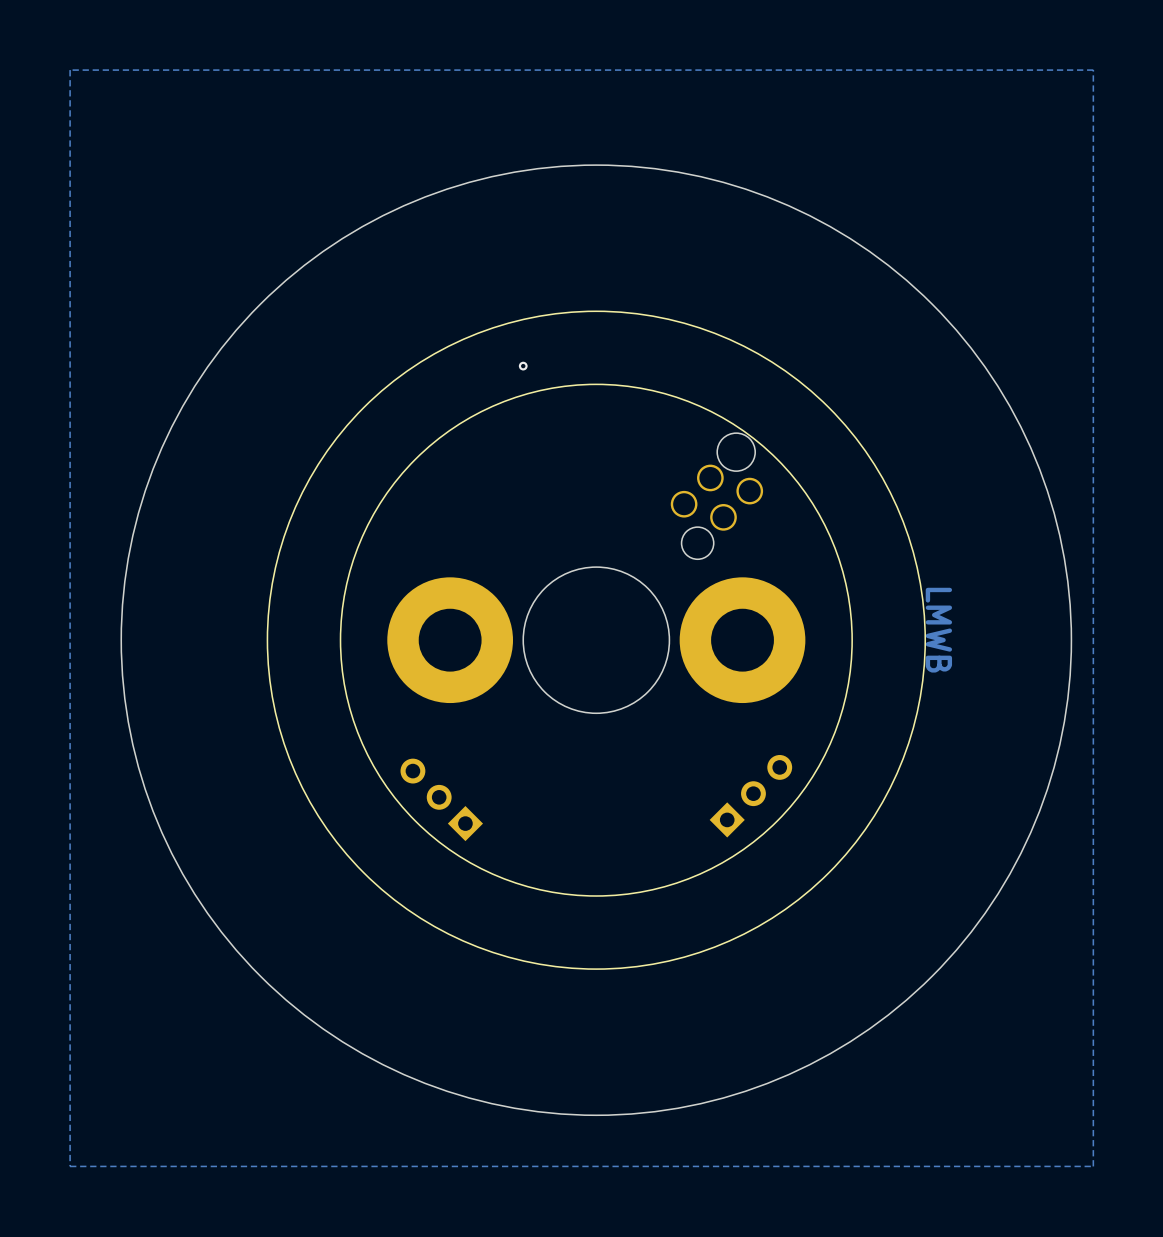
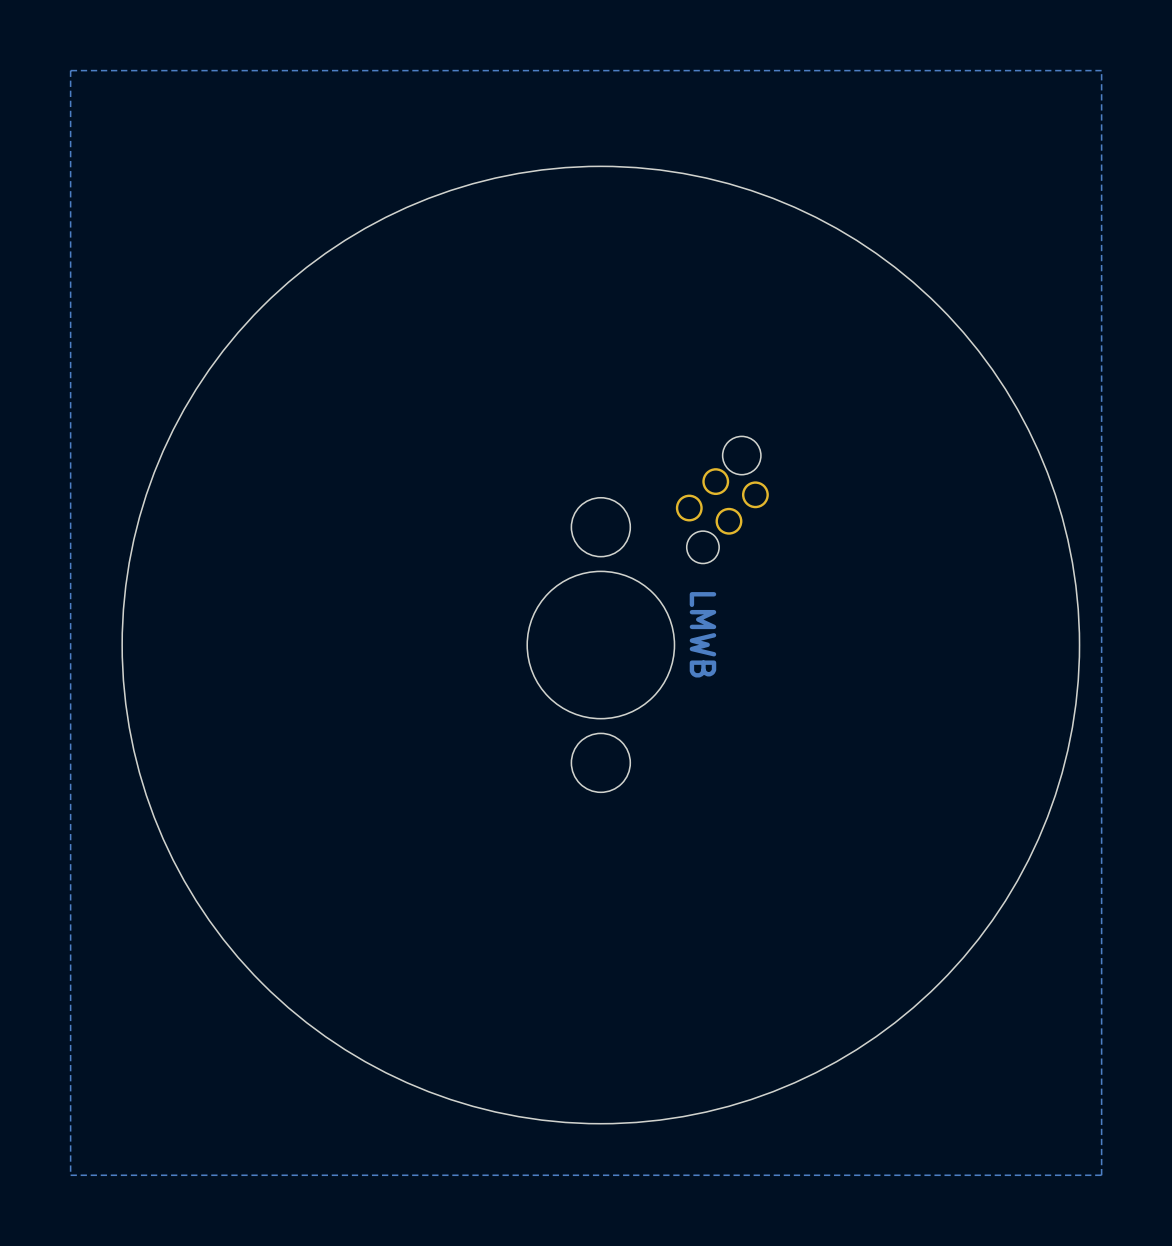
drawing: [266, 310, 926, 970] -> none
via: (523, 366) -> none
round board edge: none -> [571, 497, 631, 558]
text position: LMWB (938, 630) -> LMWB (702, 634)
part: (450, 640) -> none
part: (742, 640) -> none
round board edge: none -> [571, 733, 631, 793]
part: (750, 796) -> none
part: (441, 799) -> none

